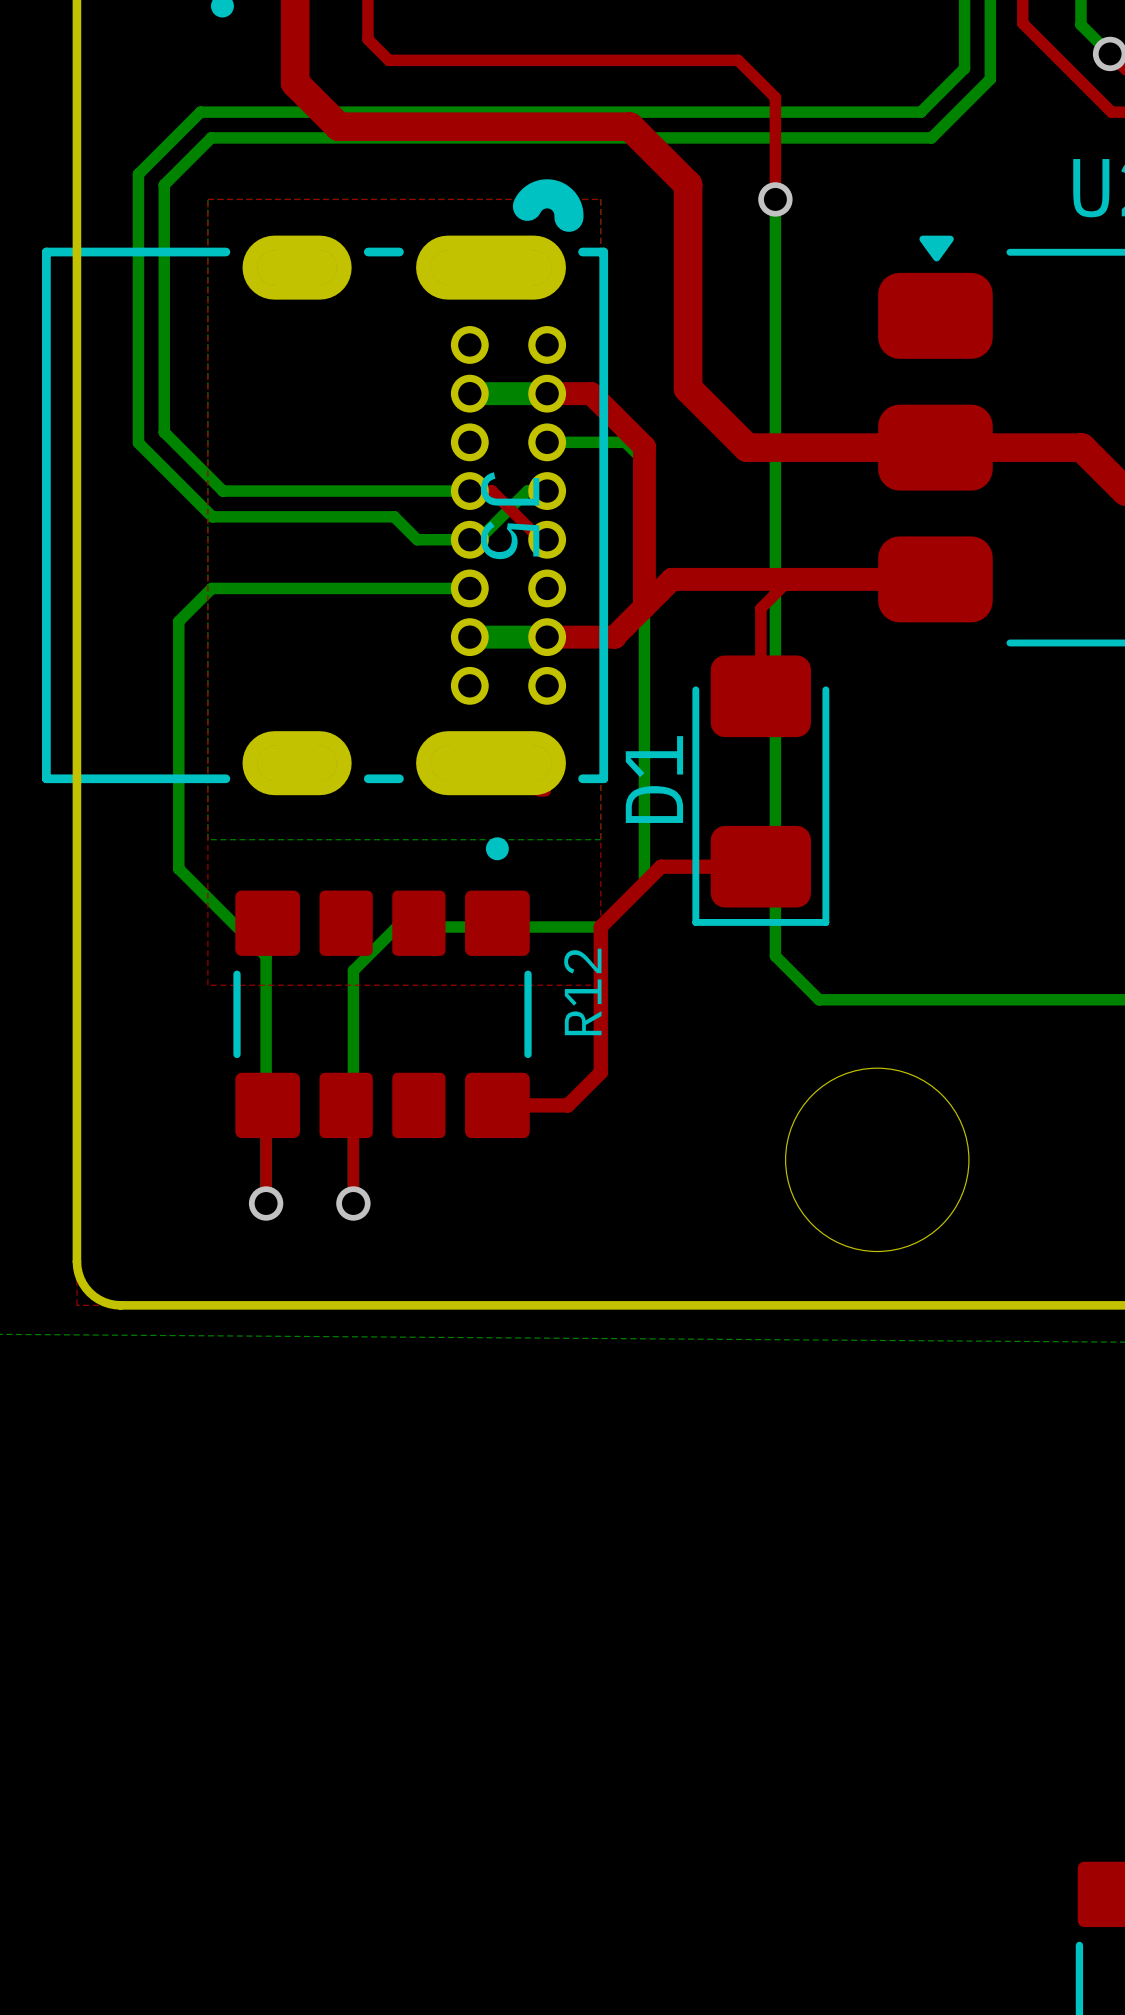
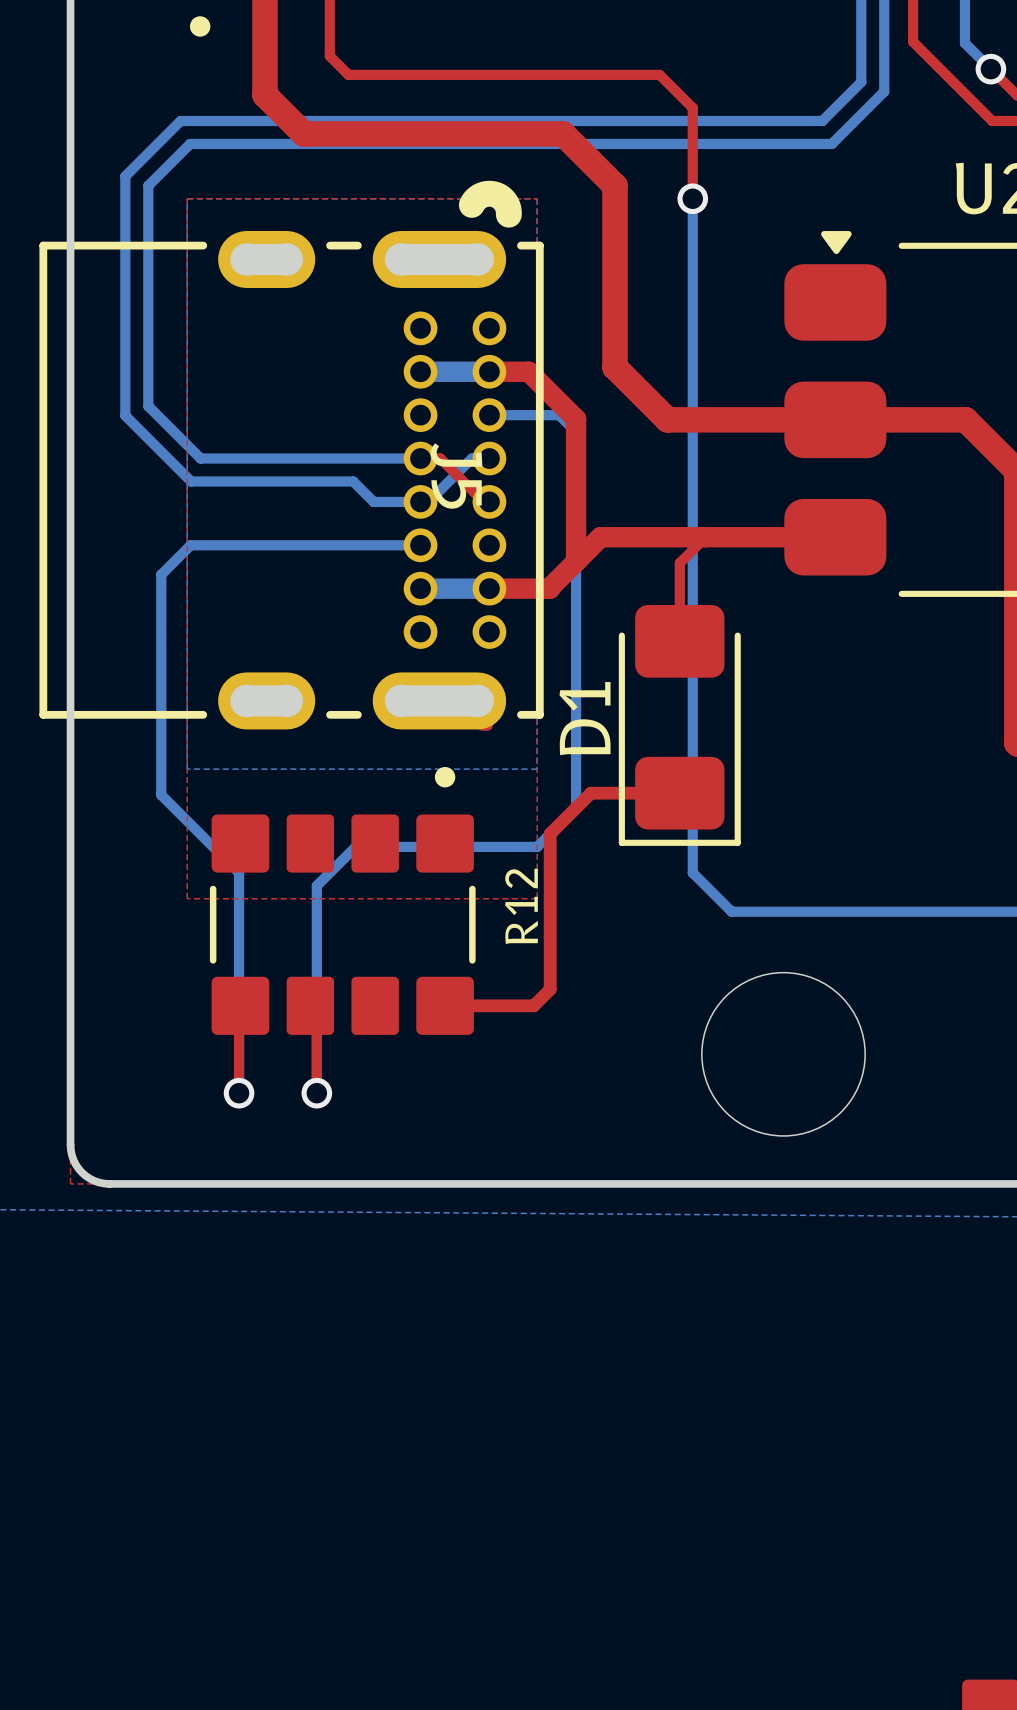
top track: (615, 912) (600, 927) (600, 1072) (567, 1105) -> (550, 833) (550, 989) (533, 1005) (507, 1005)

